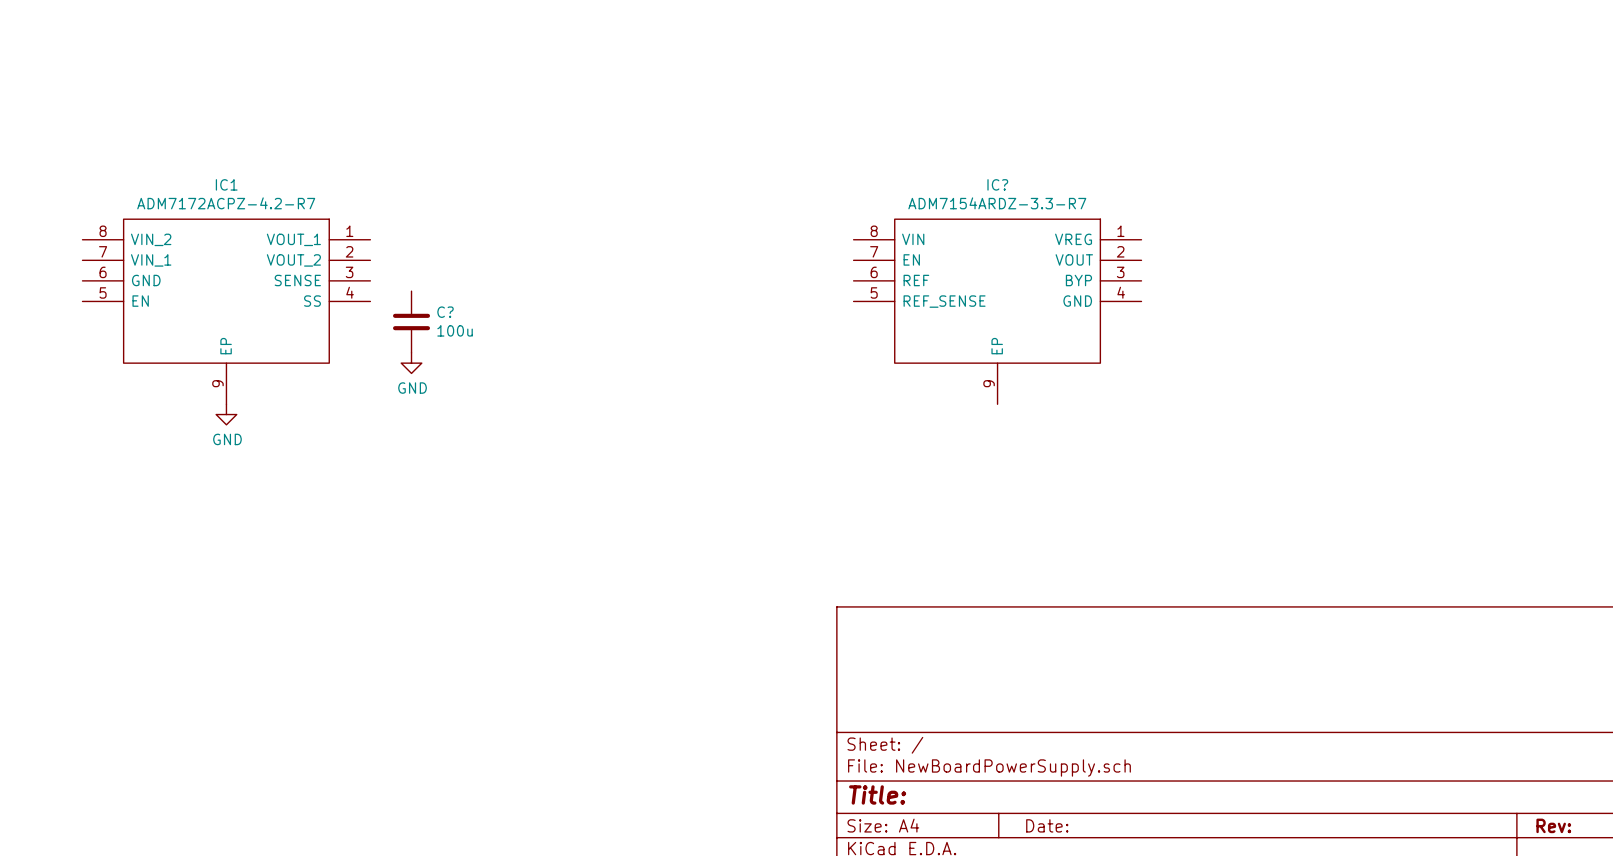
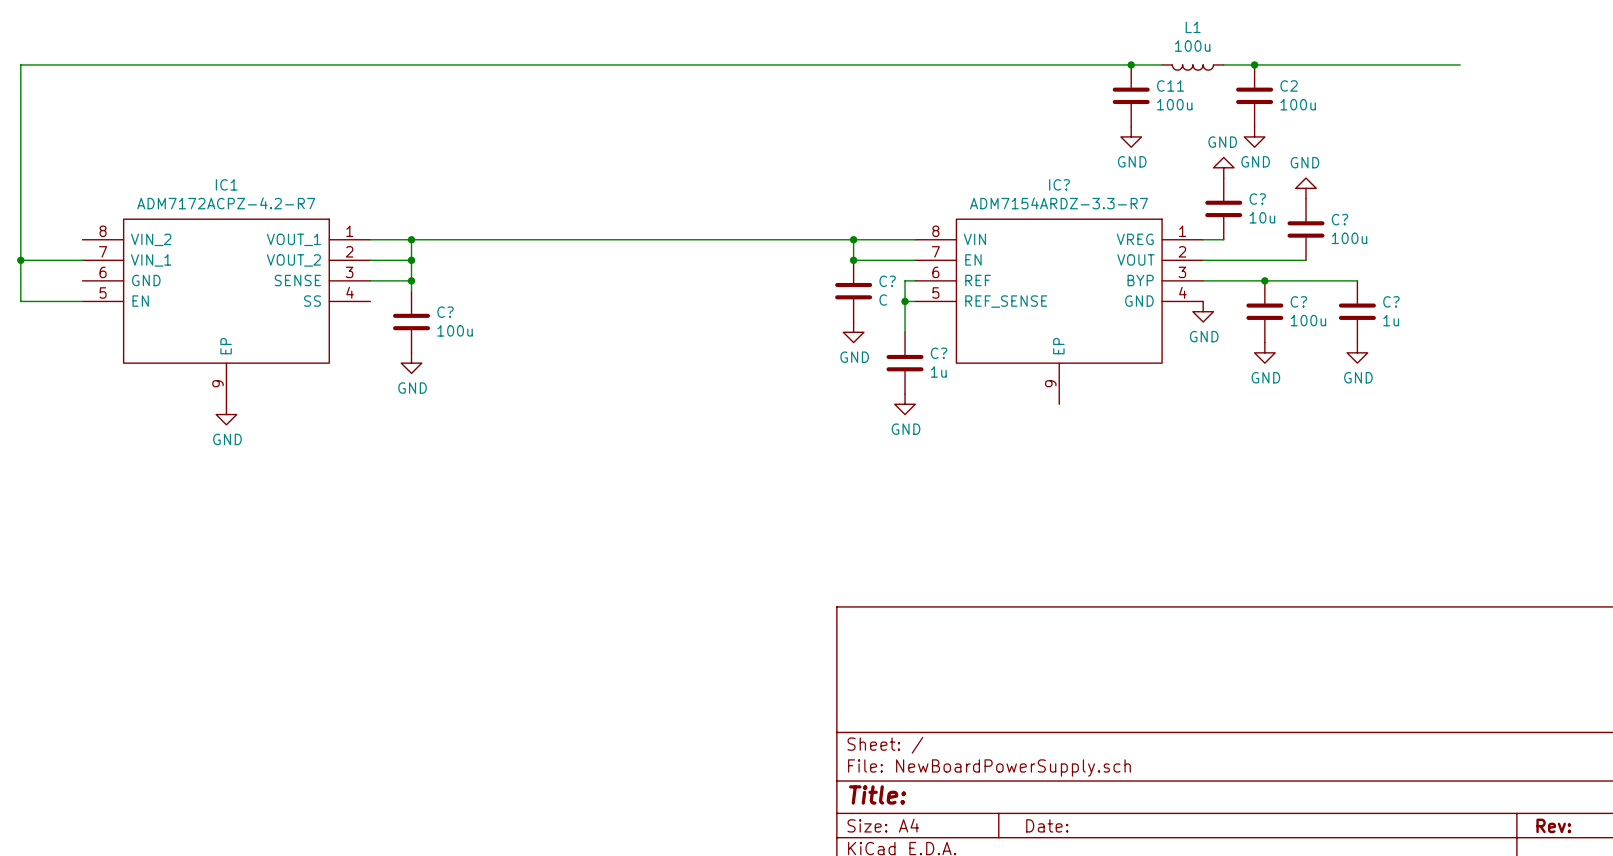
junction: none -> (1131, 64)
wire: none -> (1162, 64) (20, 64) (20, 301) (82, 301)
wire: none -> (1223, 64) (1460, 64)
junction: none -> (1254, 64)
L1: none -> 100u (1192, 67)
C11: none -> 100u (1131, 95)
C2: none -> 100u (1254, 95)
power symbol: none -> GND (1131, 136)
power symbol: none -> GND (1254, 136)
power symbol: none -> GND (1223, 167)
power symbol: none -> GND (1305, 188)
C?: none -> 10u (1223, 208)
C?: none -> 100u (1305, 229)
wire: none -> (370, 239) (915, 239)
wire: none -> (411, 239) (411, 291)
junction: none -> (411, 239)
wire: none -> (853, 239) (853, 260) (915, 260)
junction: none -> (853, 239)
wire: none -> (1203, 239) (1223, 239)
wire: none -> (20, 260) (82, 260)
junction: none -> (20, 260)
wire: none -> (370, 260) (411, 260)
junction: none -> (411, 260)
junction: none -> (853, 260)
wire: none -> (1203, 260) (1305, 260)
wire: none -> (370, 280) (411, 280)
junction: none -> (411, 280)
wire: none -> (915, 280) (905, 280) (905, 332)
wire: none -> (1203, 280) (1357, 280)
junction: none -> (1264, 280)
C?: none -> C (853, 291)
wire: none -> (905, 301) (915, 301)
junction: none -> (905, 301)
IC? position: (997, 311) -> (1059, 311)
power symbol: none -> GND (1203, 311)
C?: none -> 100u (1264, 311)
C?: none -> 1u (1357, 311)
power symbol: none -> GND (853, 332)
power symbol: none -> GND (1264, 352)
power symbol: none -> GND (1357, 352)
C?: none -> 1u (905, 363)
power symbol: none -> GND (905, 404)

